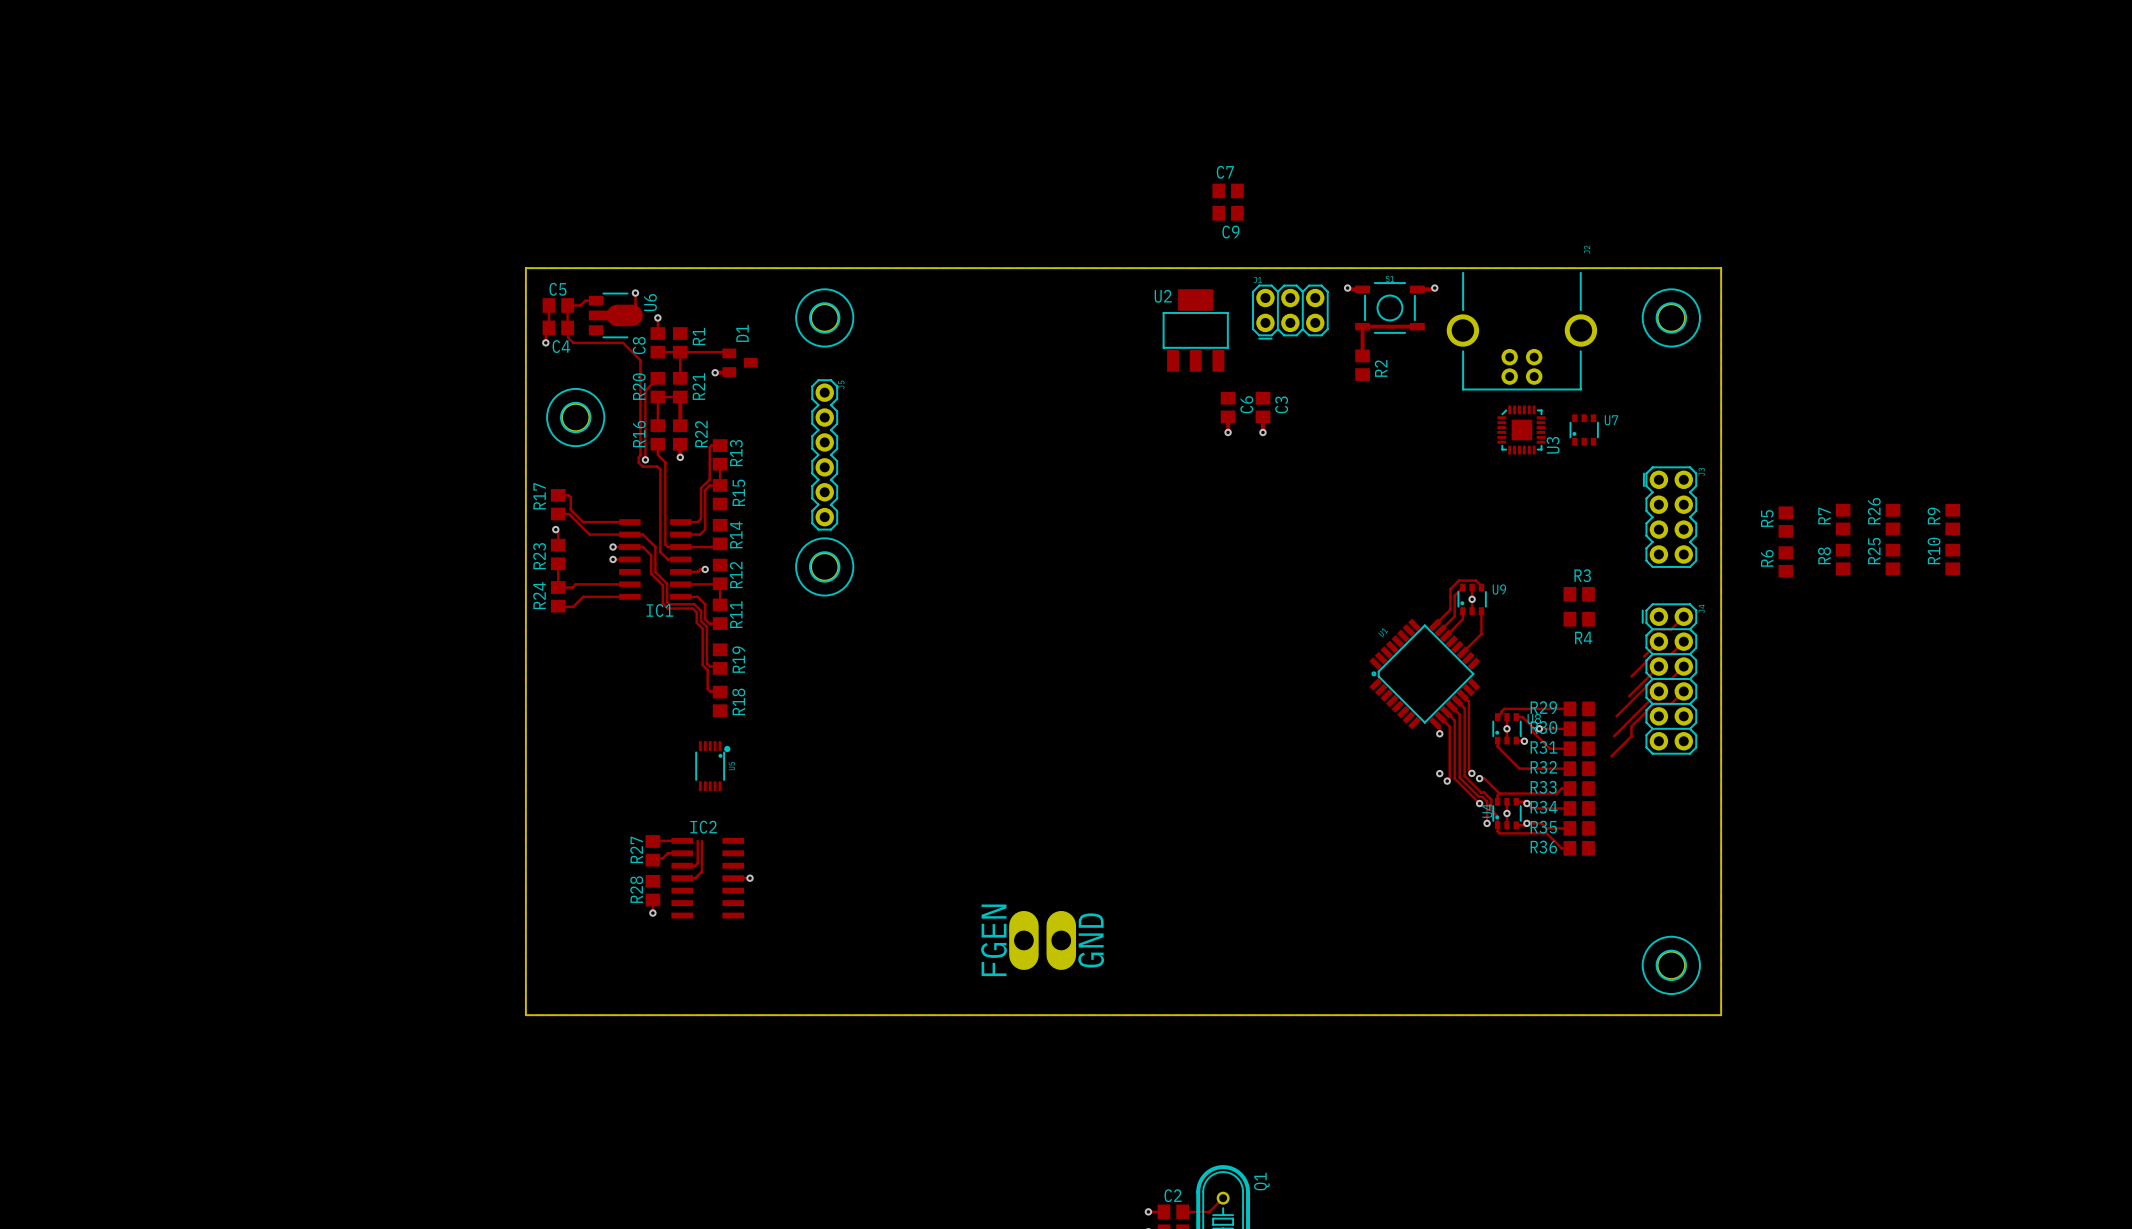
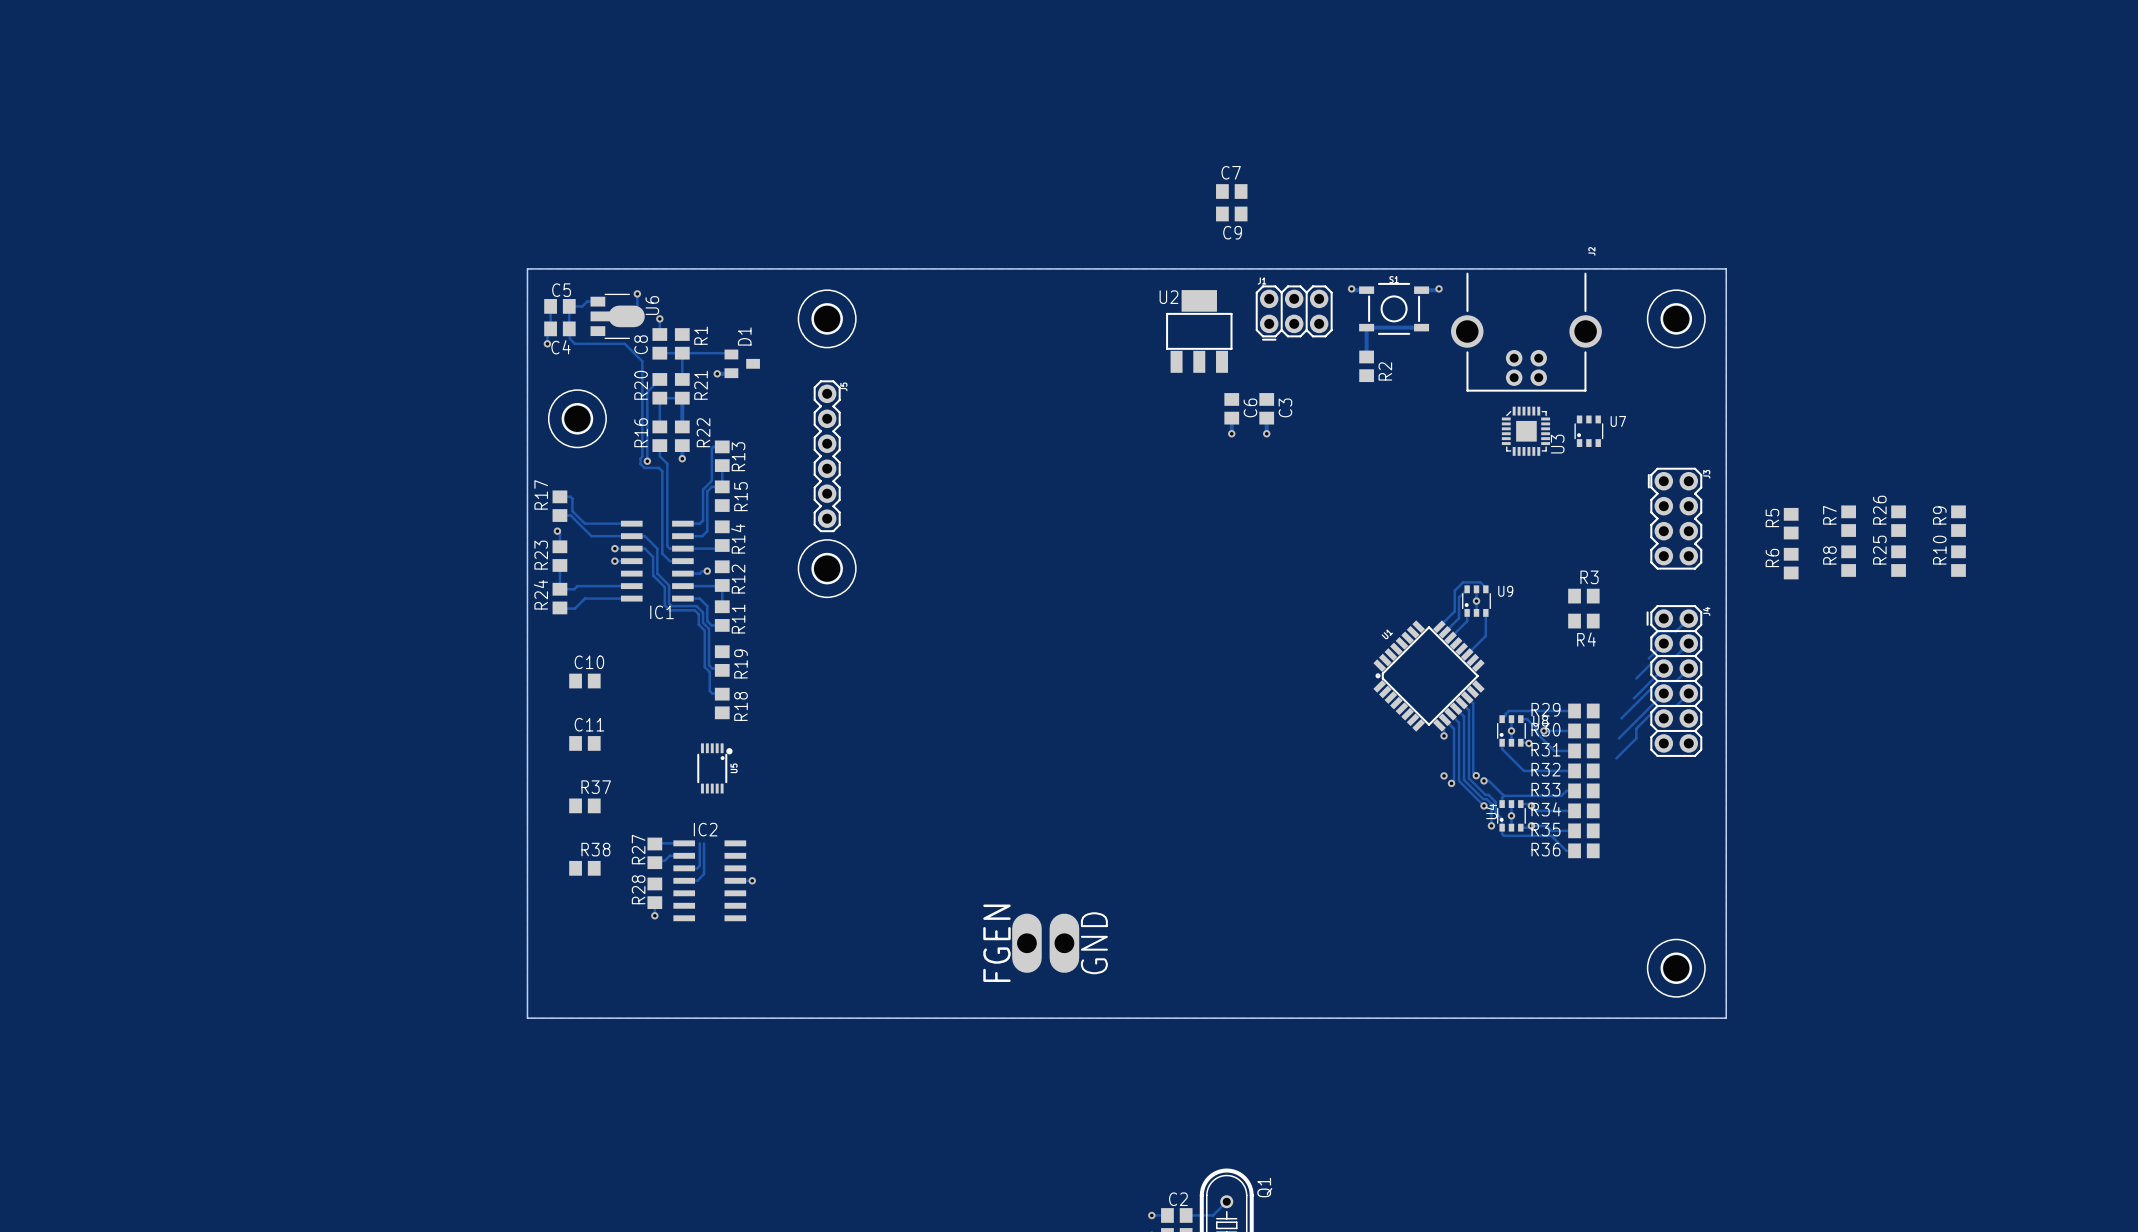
C10: none -> (584, 681)
C11: none -> (584, 743)
R37: none -> (584, 805)
R38: none -> (584, 868)

